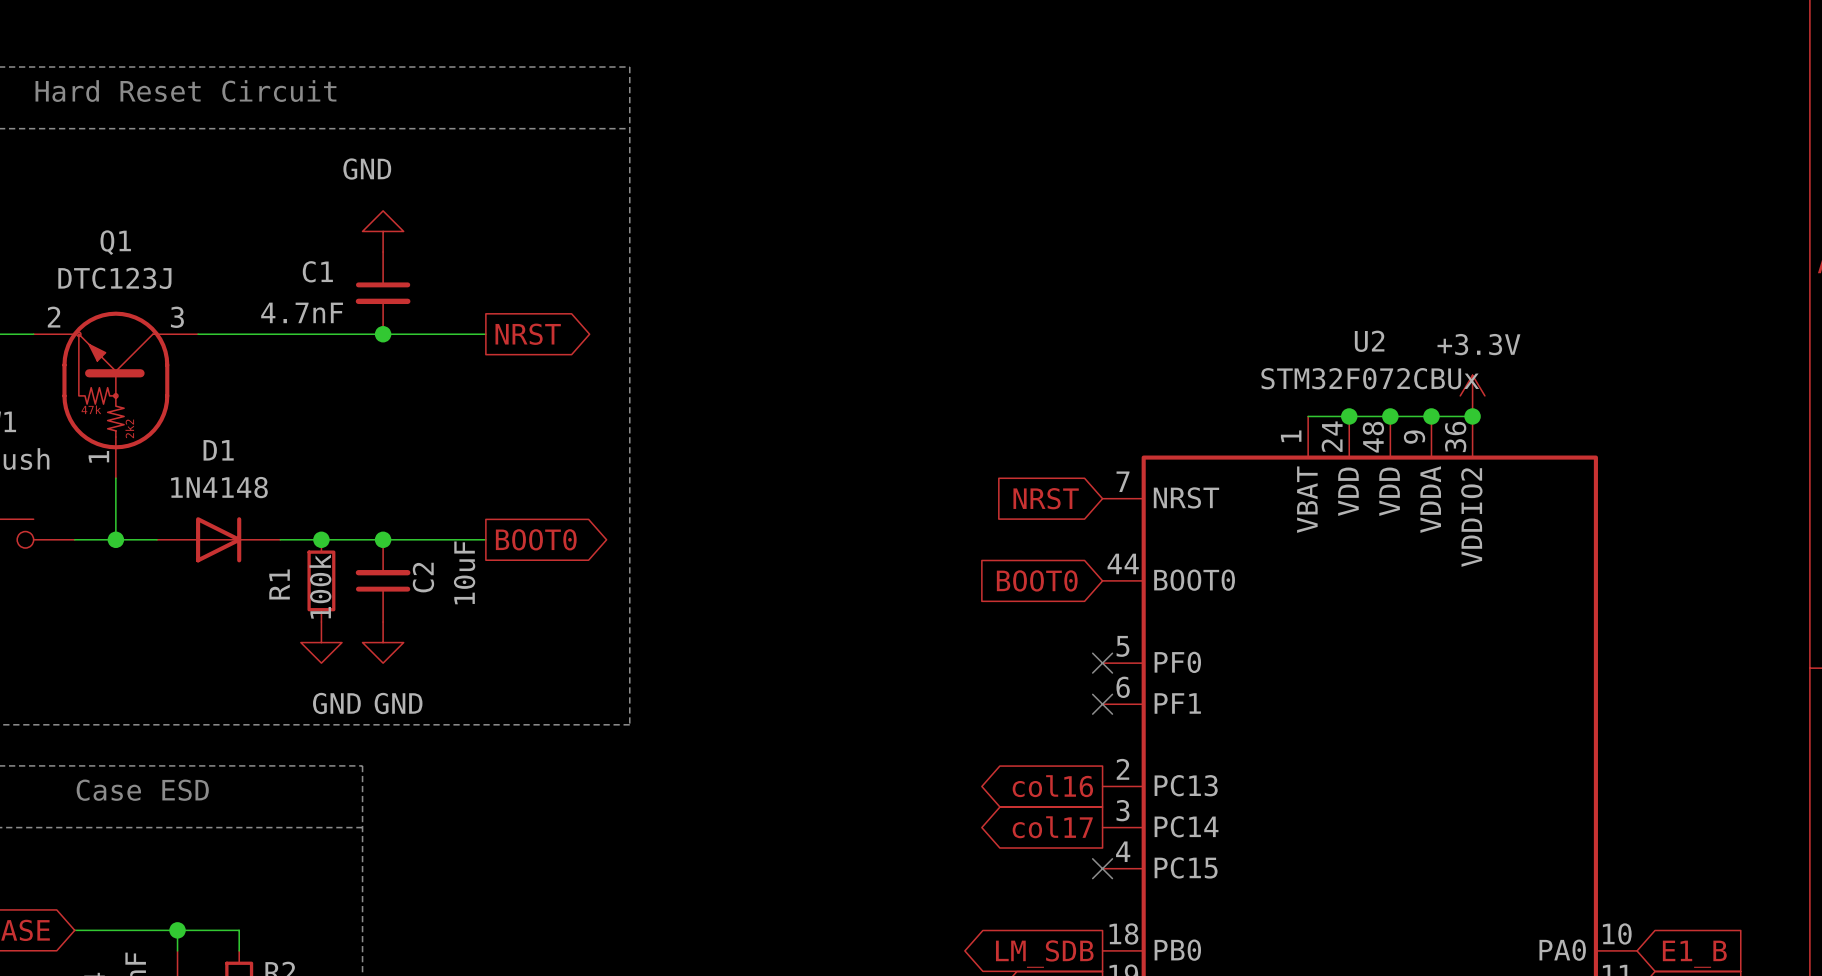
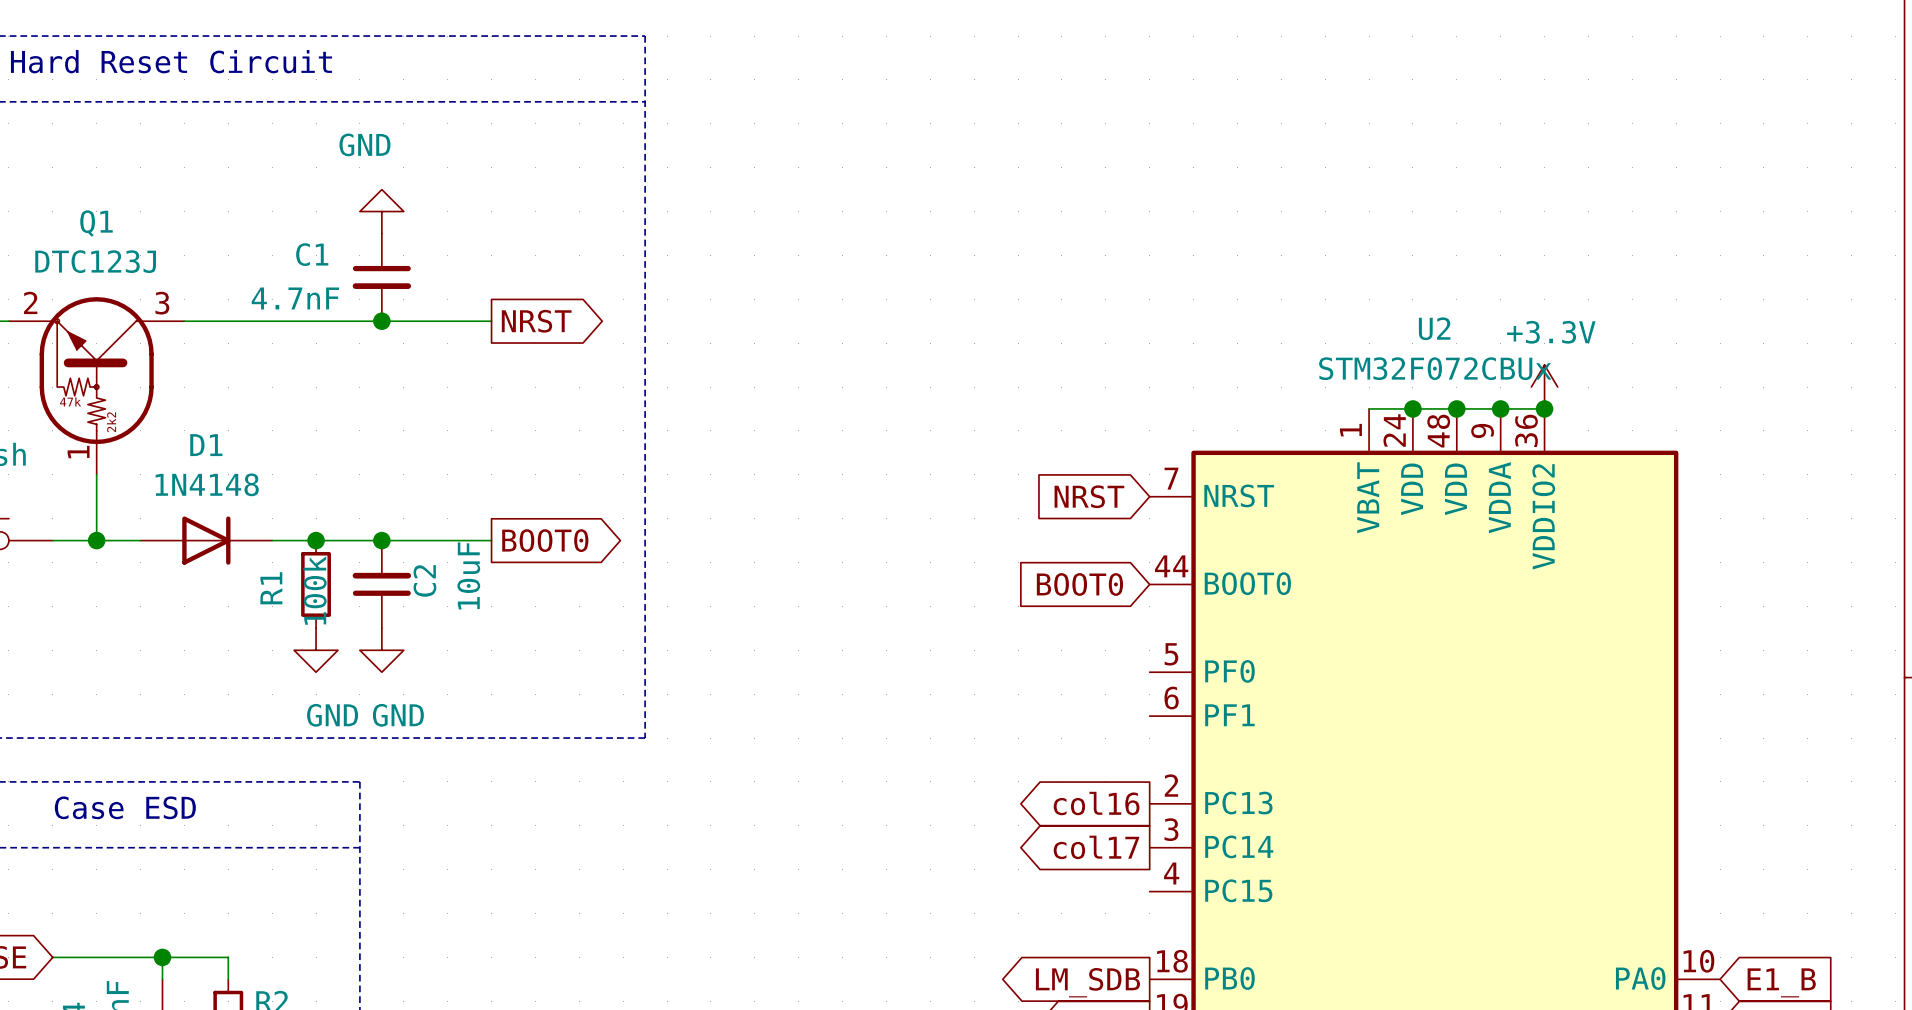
no-connect mark: (1102, 663) -> none
no-connect mark: (1102, 704) -> none
no-connect mark: (1102, 868) -> none

